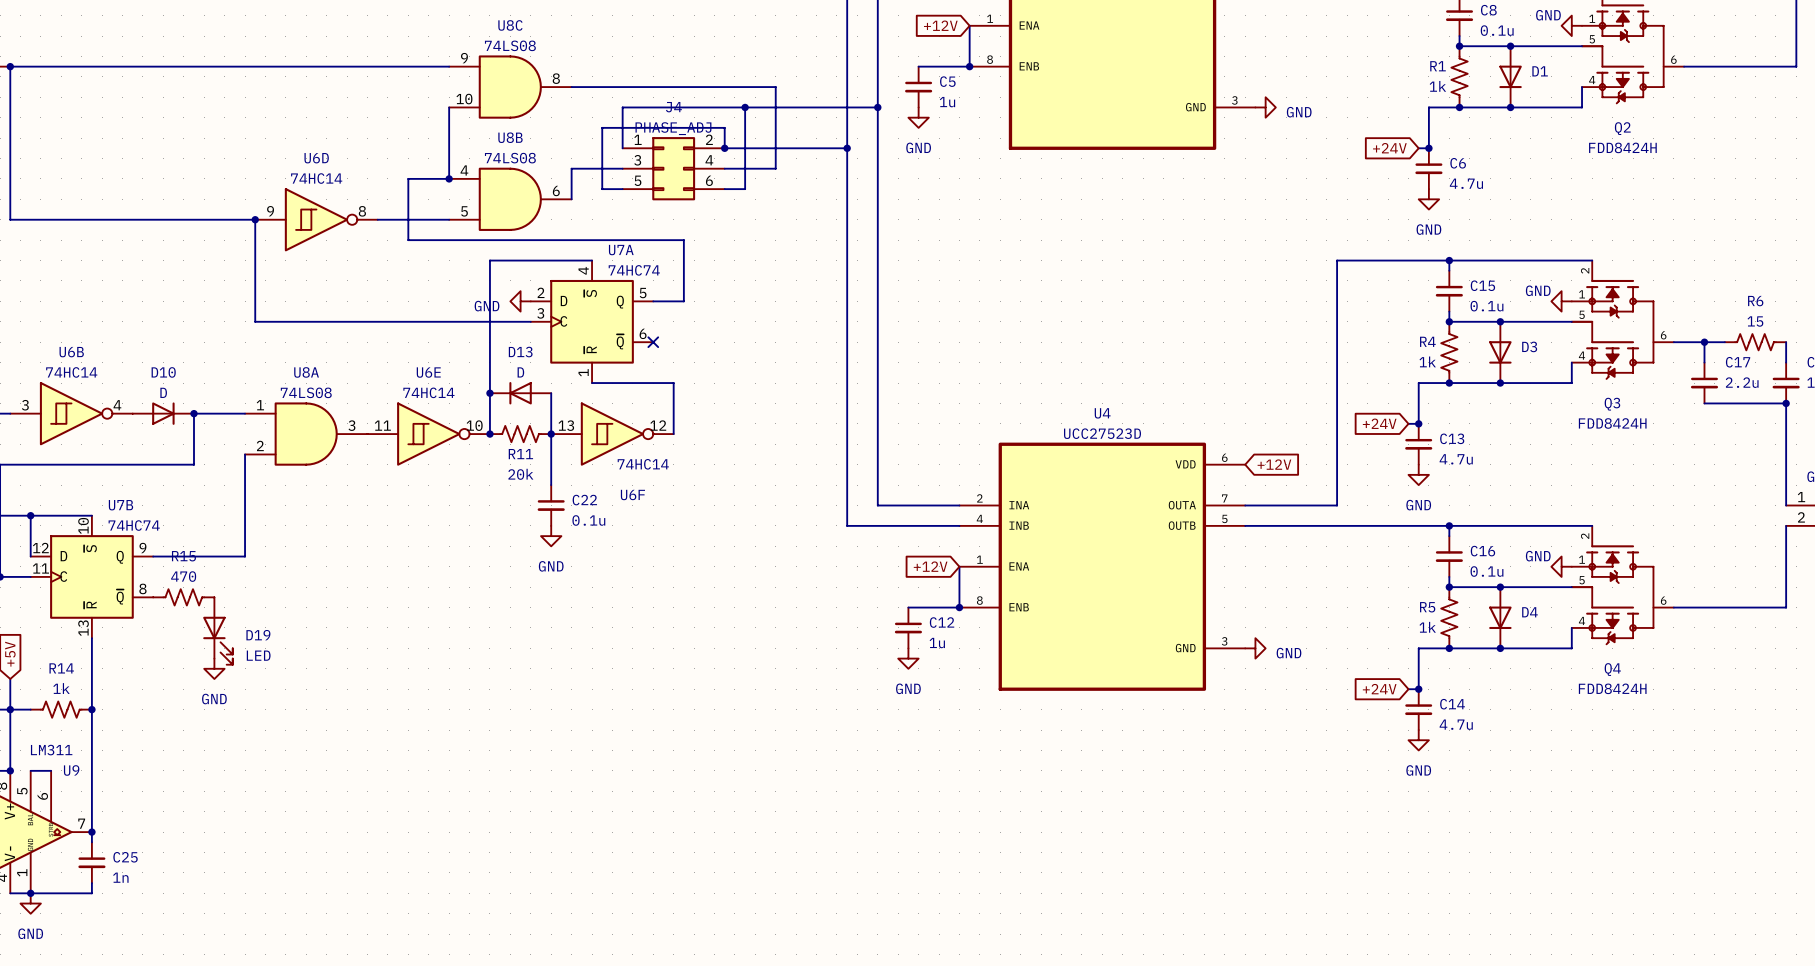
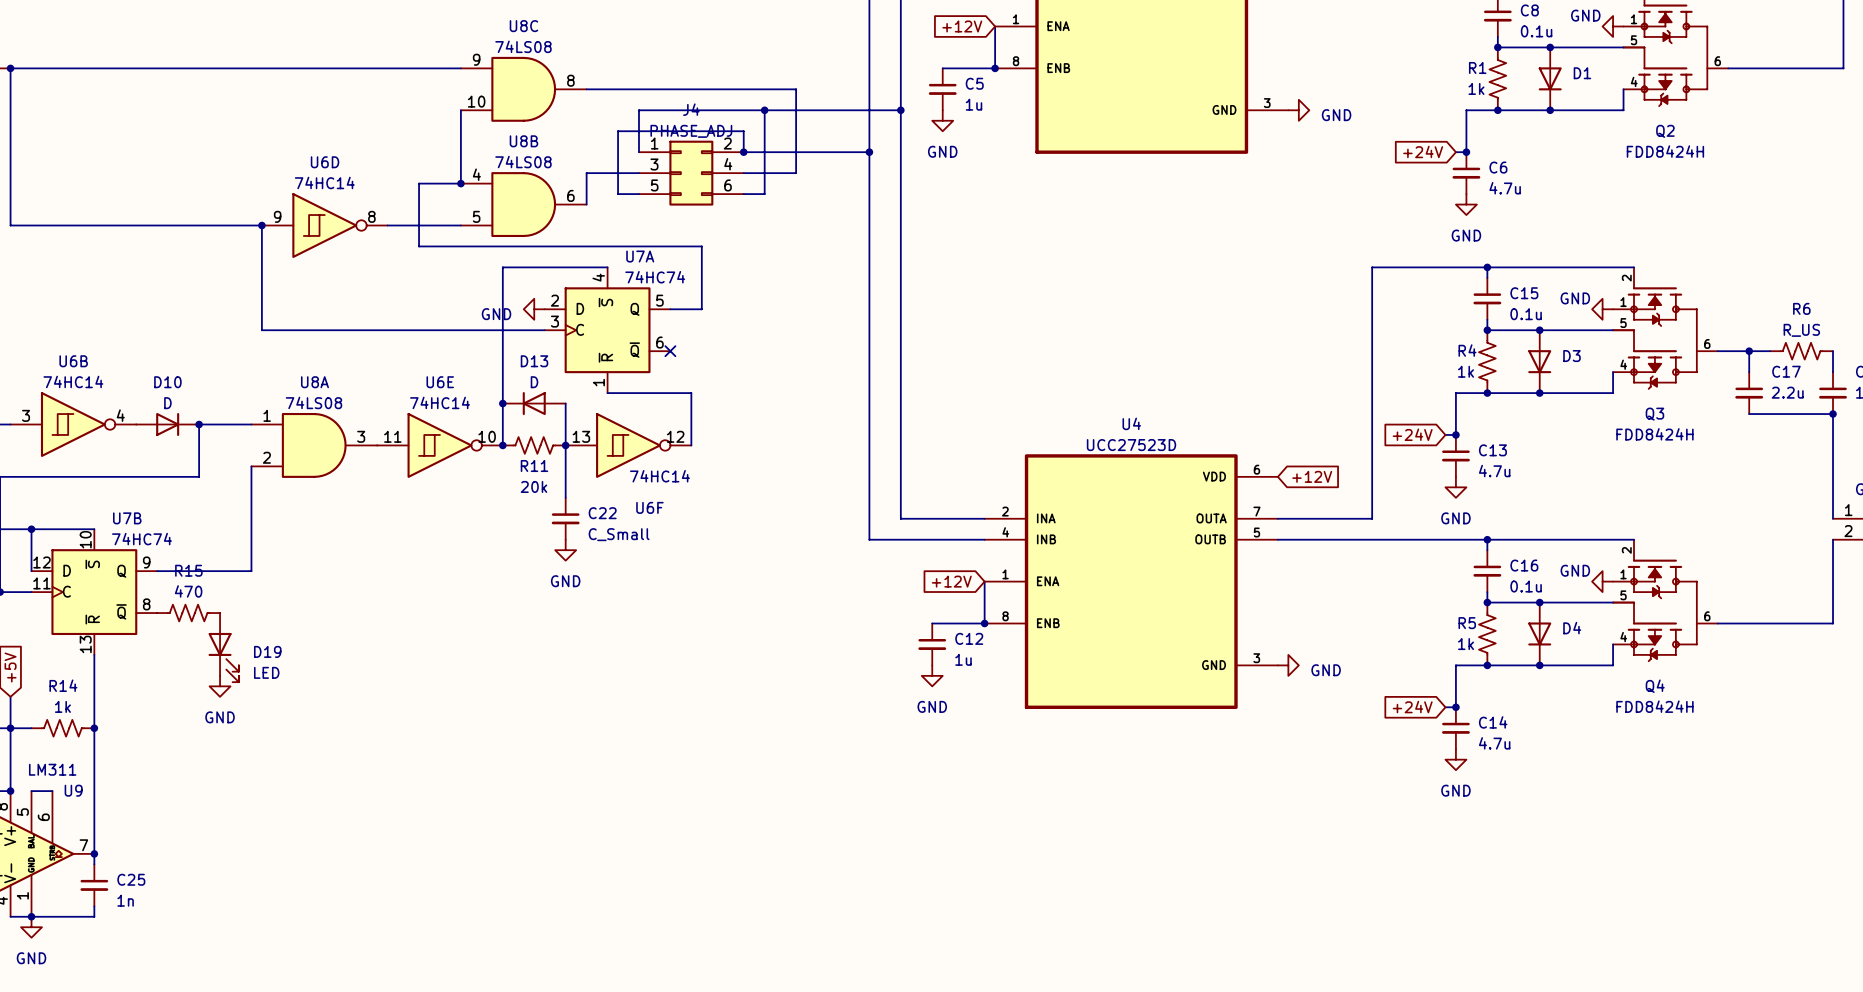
R6 value: 15 (1755, 321) -> R_US (1801, 330)
C22 value: 0.1u (588, 520) -> C_Small (619, 534)

